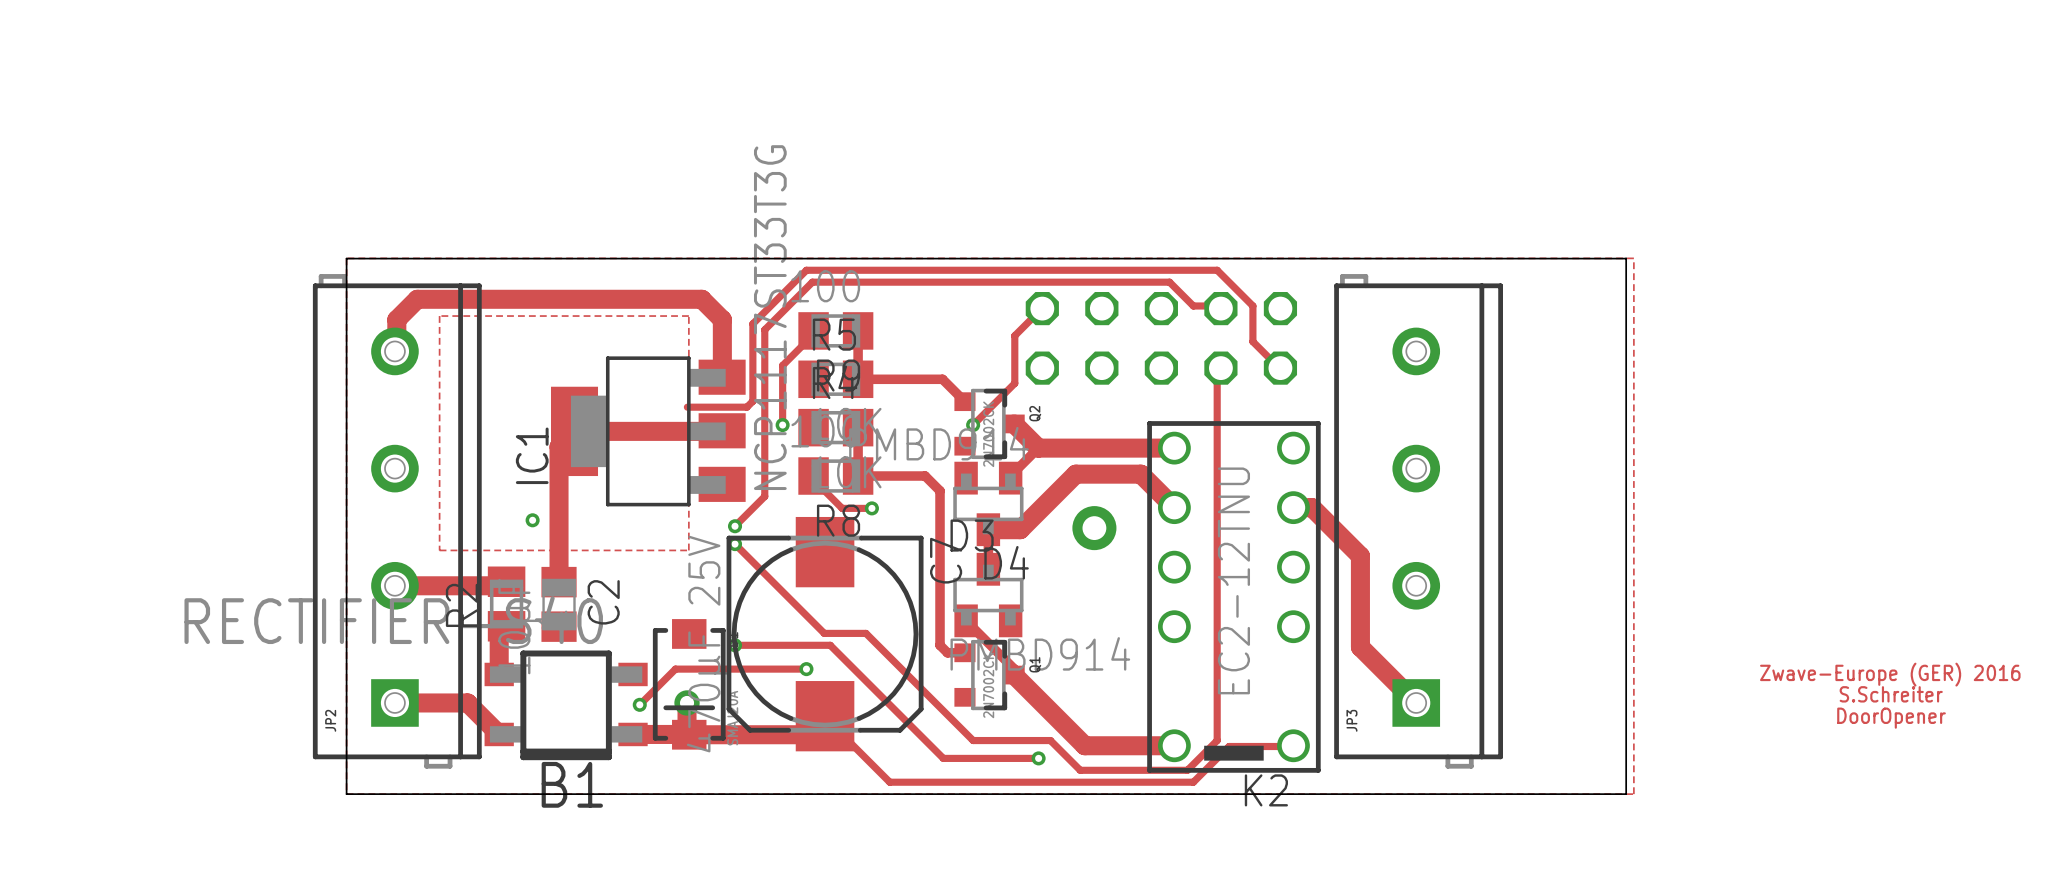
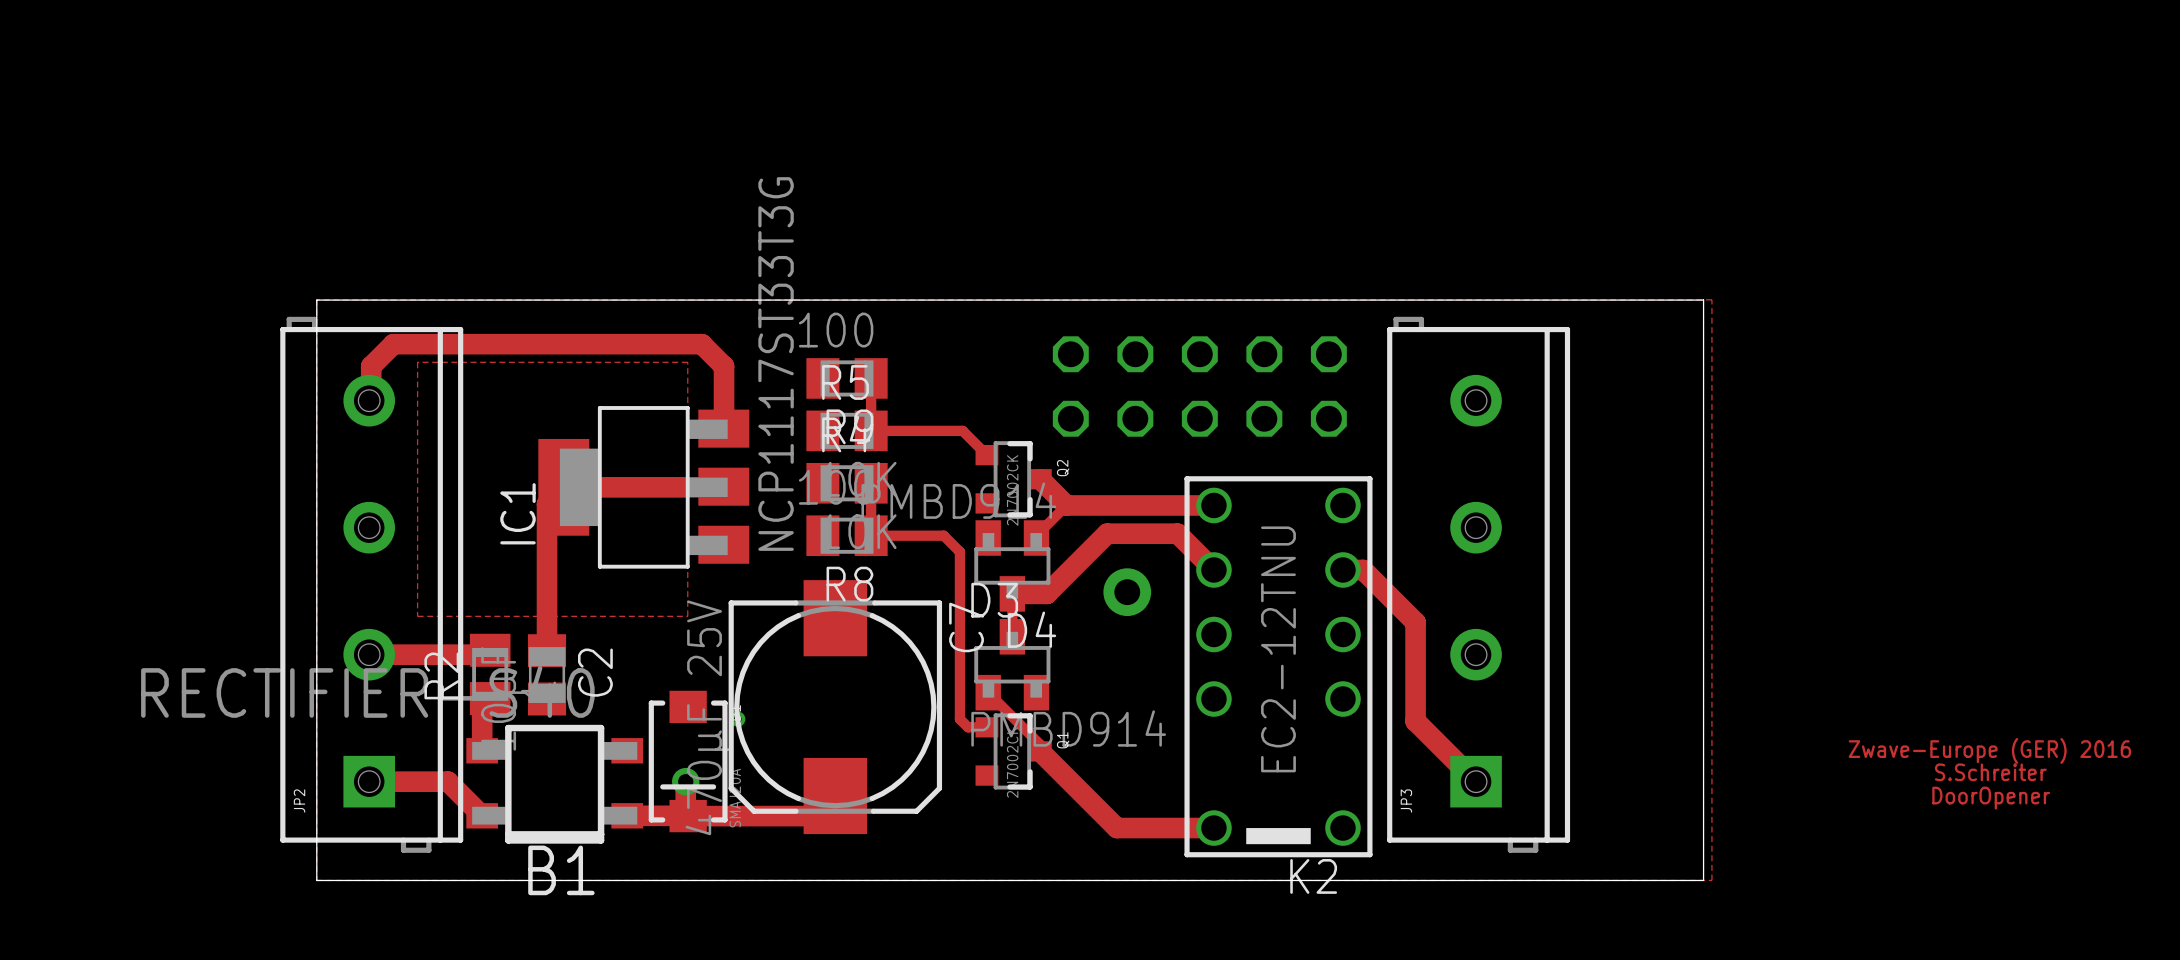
track: (1042, 308) (1014, 335) (1014, 383) (973, 425) -> none
track: (1220, 308) (1217, 305) (1193, 305) (1169, 282) (812, 282) (764, 329) (764, 496) (735, 526) -> none
track: (813, 330) (812, 335) (782, 365) (782, 425) -> none
track: (1220, 368) (1217, 371) (1217, 740) (1187, 770) (1080, 770) (1050, 740) (973, 740) (865, 633) (824, 633) (735, 544) -> none
track: (1280, 368) (1252, 341) (1252, 305) (1217, 270) (806, 270) (752, 323) (752, 401) (746, 407) (687, 407) -> none
via: (782, 425) -> none
via: (973, 425) -> none
track: (813, 476) (812, 478) (842, 508) (871, 508) -> none
via: (871, 508) -> none
via: (532, 520) -> none
via: (735, 526) -> none
via: (735, 544) -> none
track: (735, 645) (830, 645) (943, 758) (1038, 758) -> none
track: (806, 669) (675, 669) (639, 704) -> none
via: (806, 669) -> none
via: (639, 704) -> none
track: (825, 716) (889, 782) (1193, 782) (1229, 746) (1293, 745) -> none
via: (1038, 758) -> none

